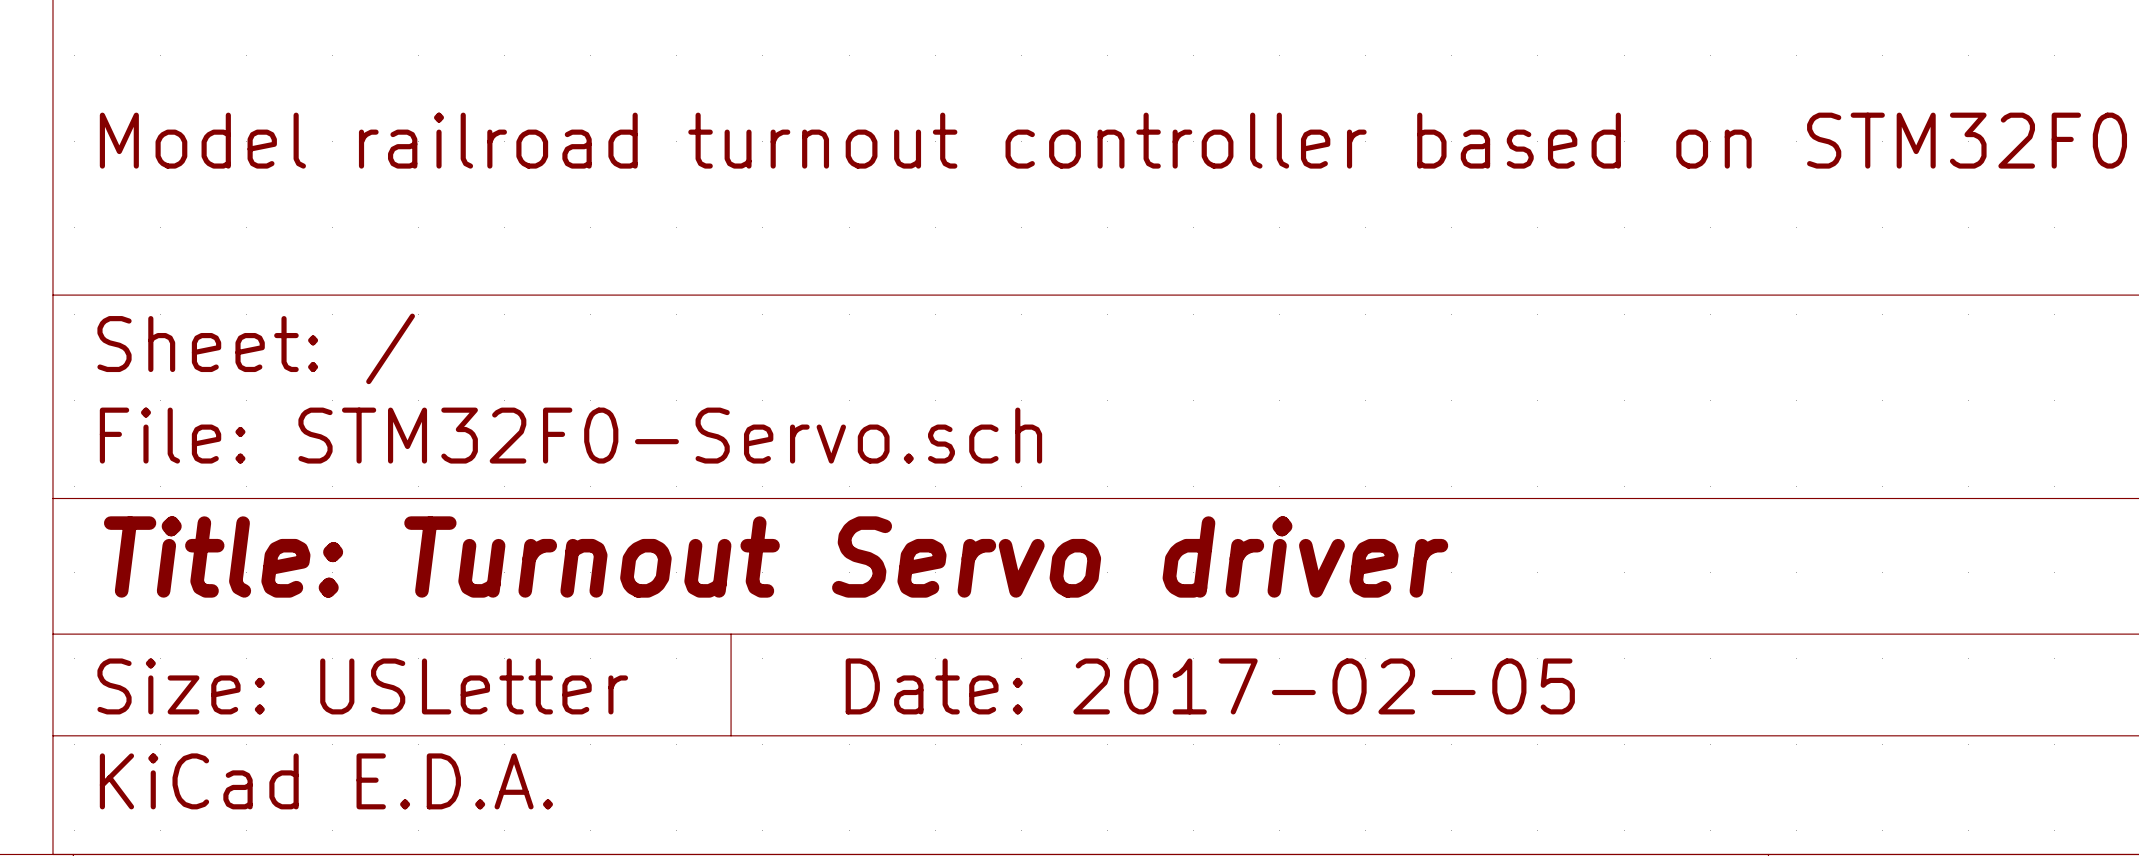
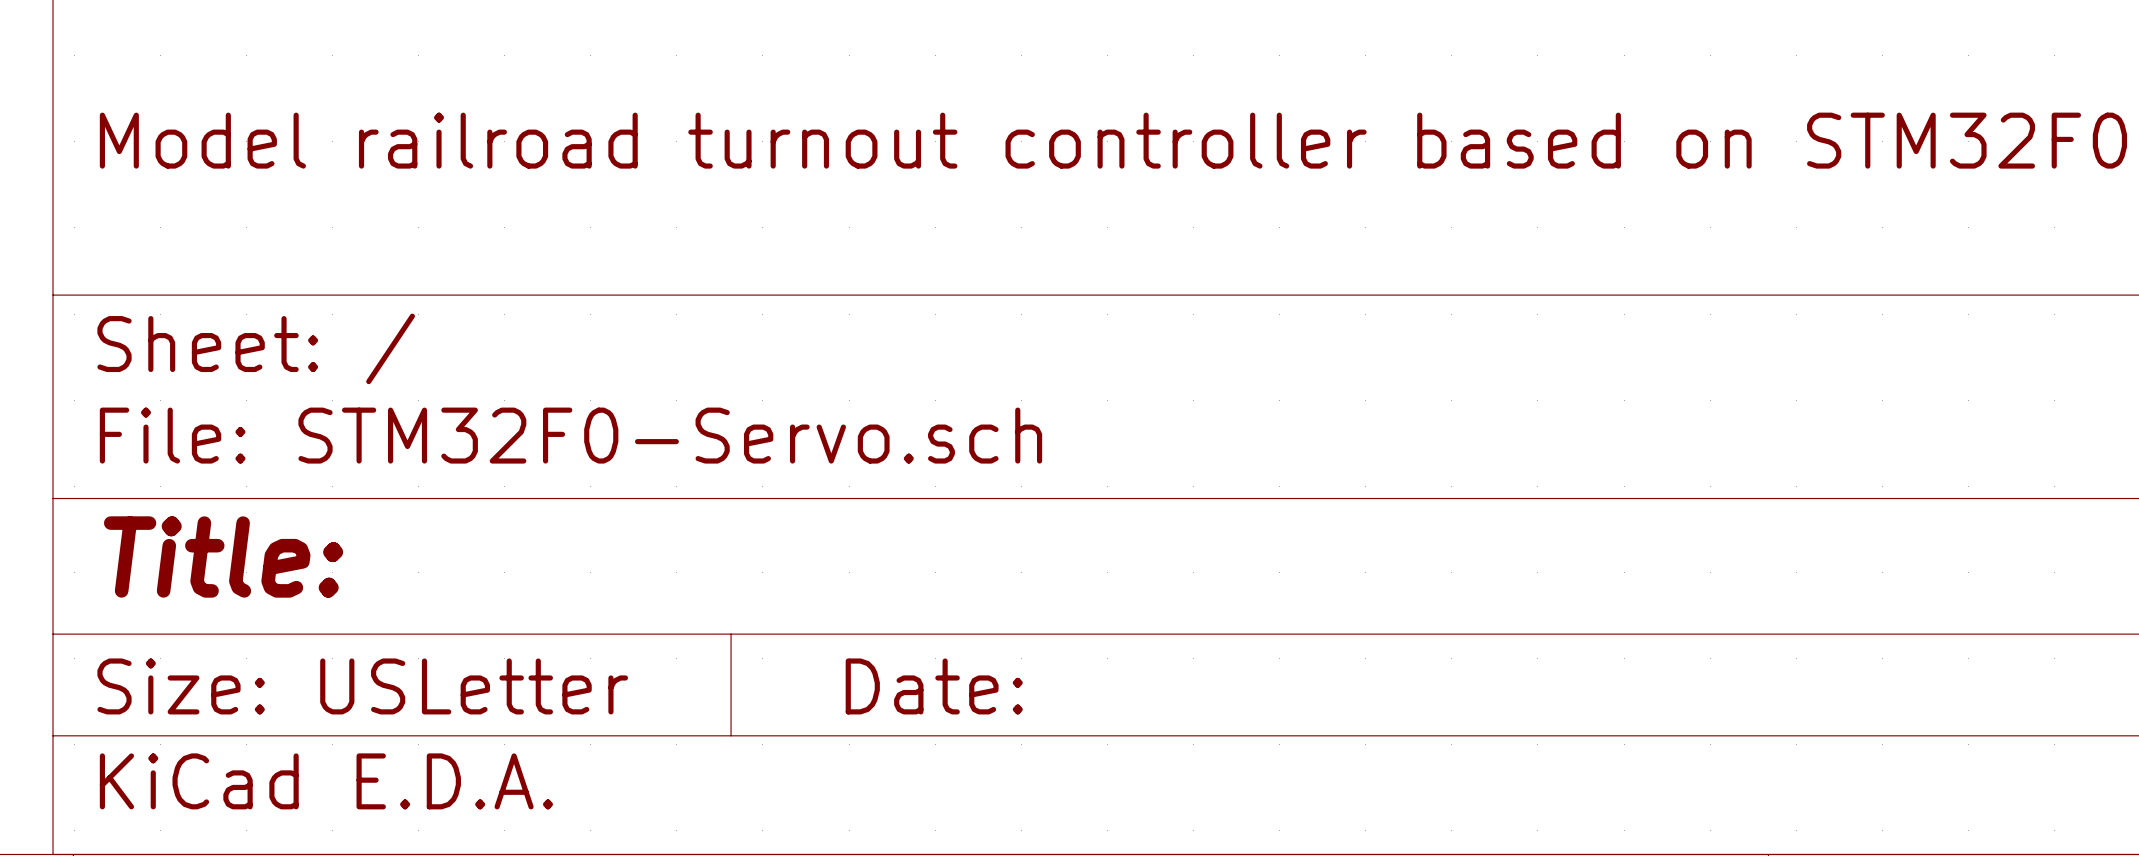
title block: Title: Turnout Servo driver (776, 556) -> Title: (223, 556)
title block: Date: 2017-02-05 (1210, 686) -> Date: (934, 686)

